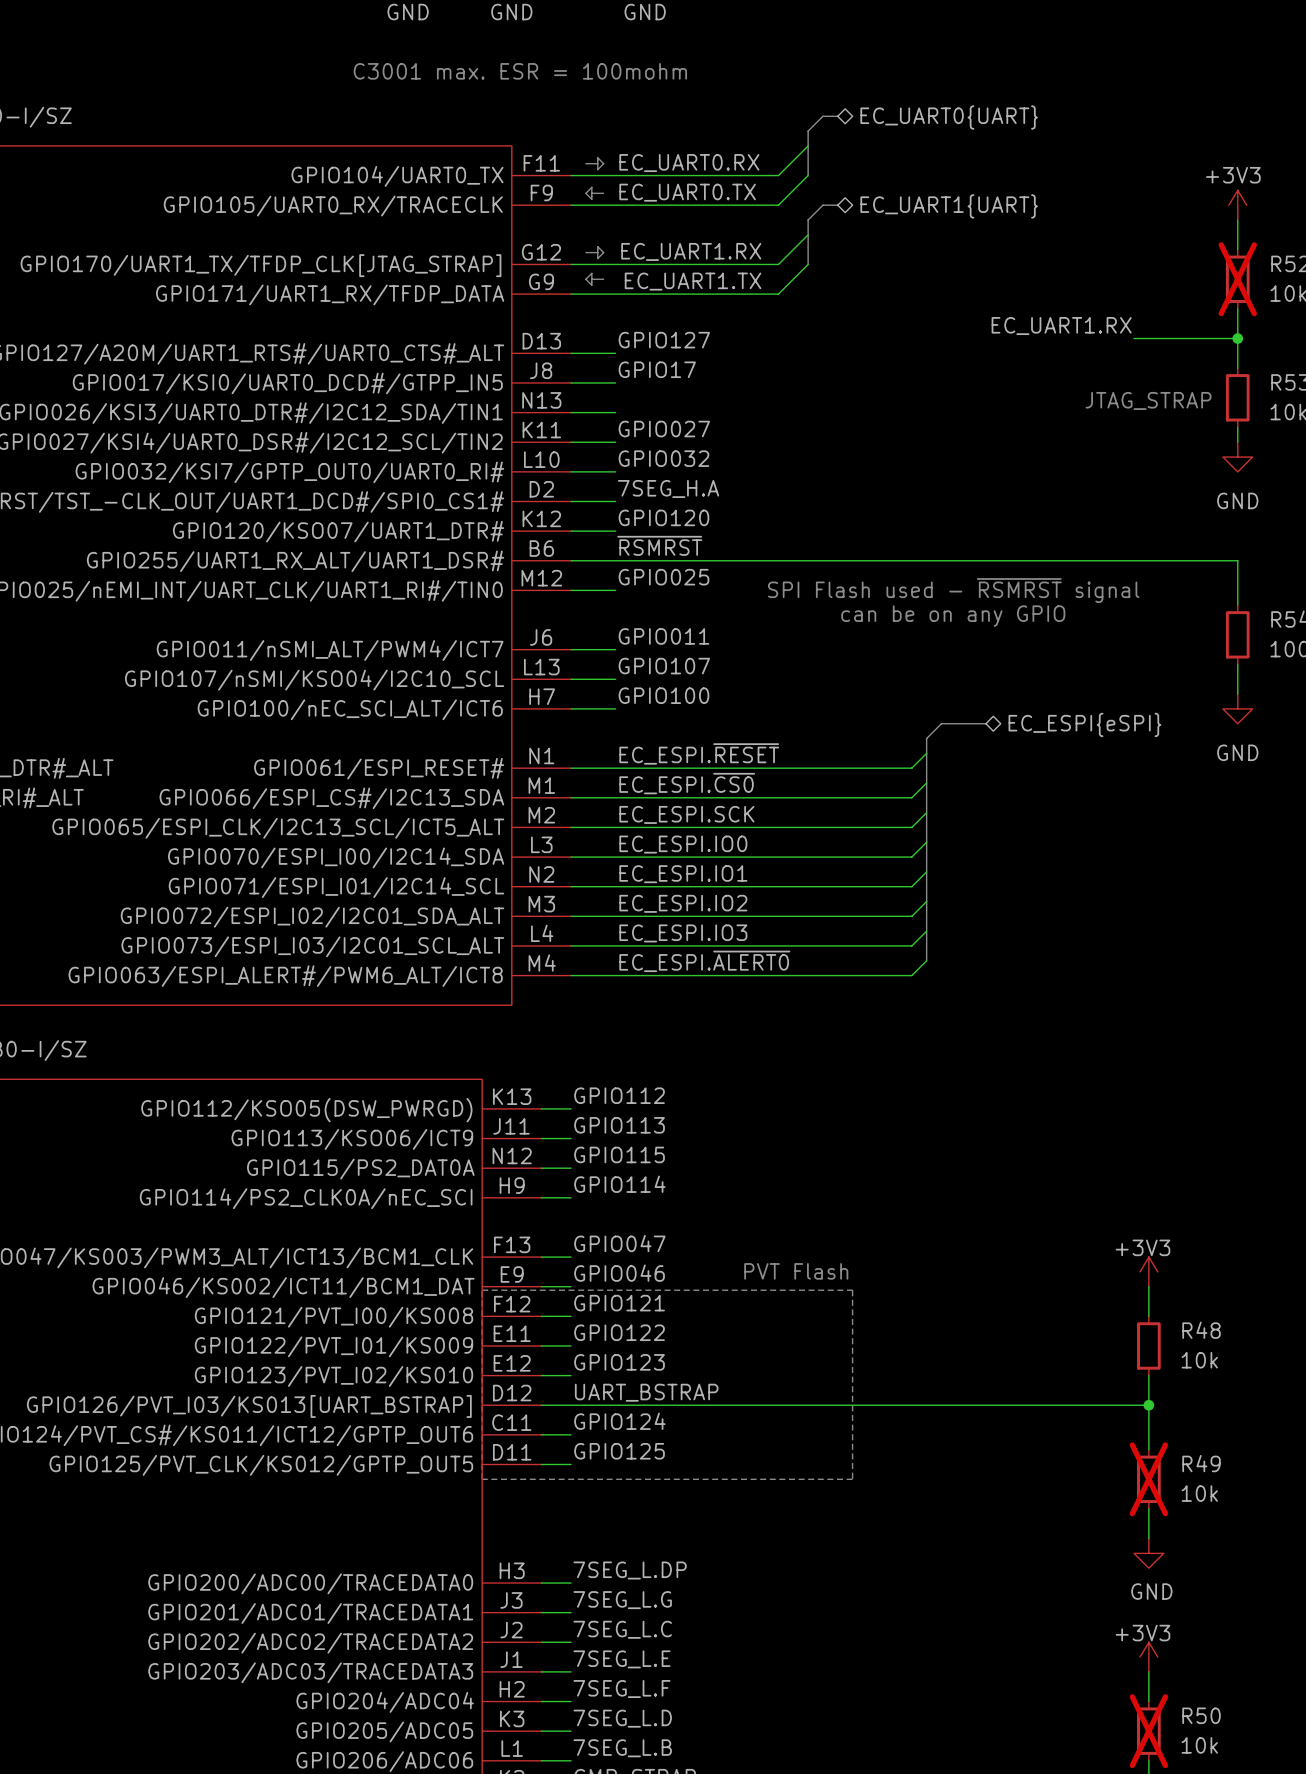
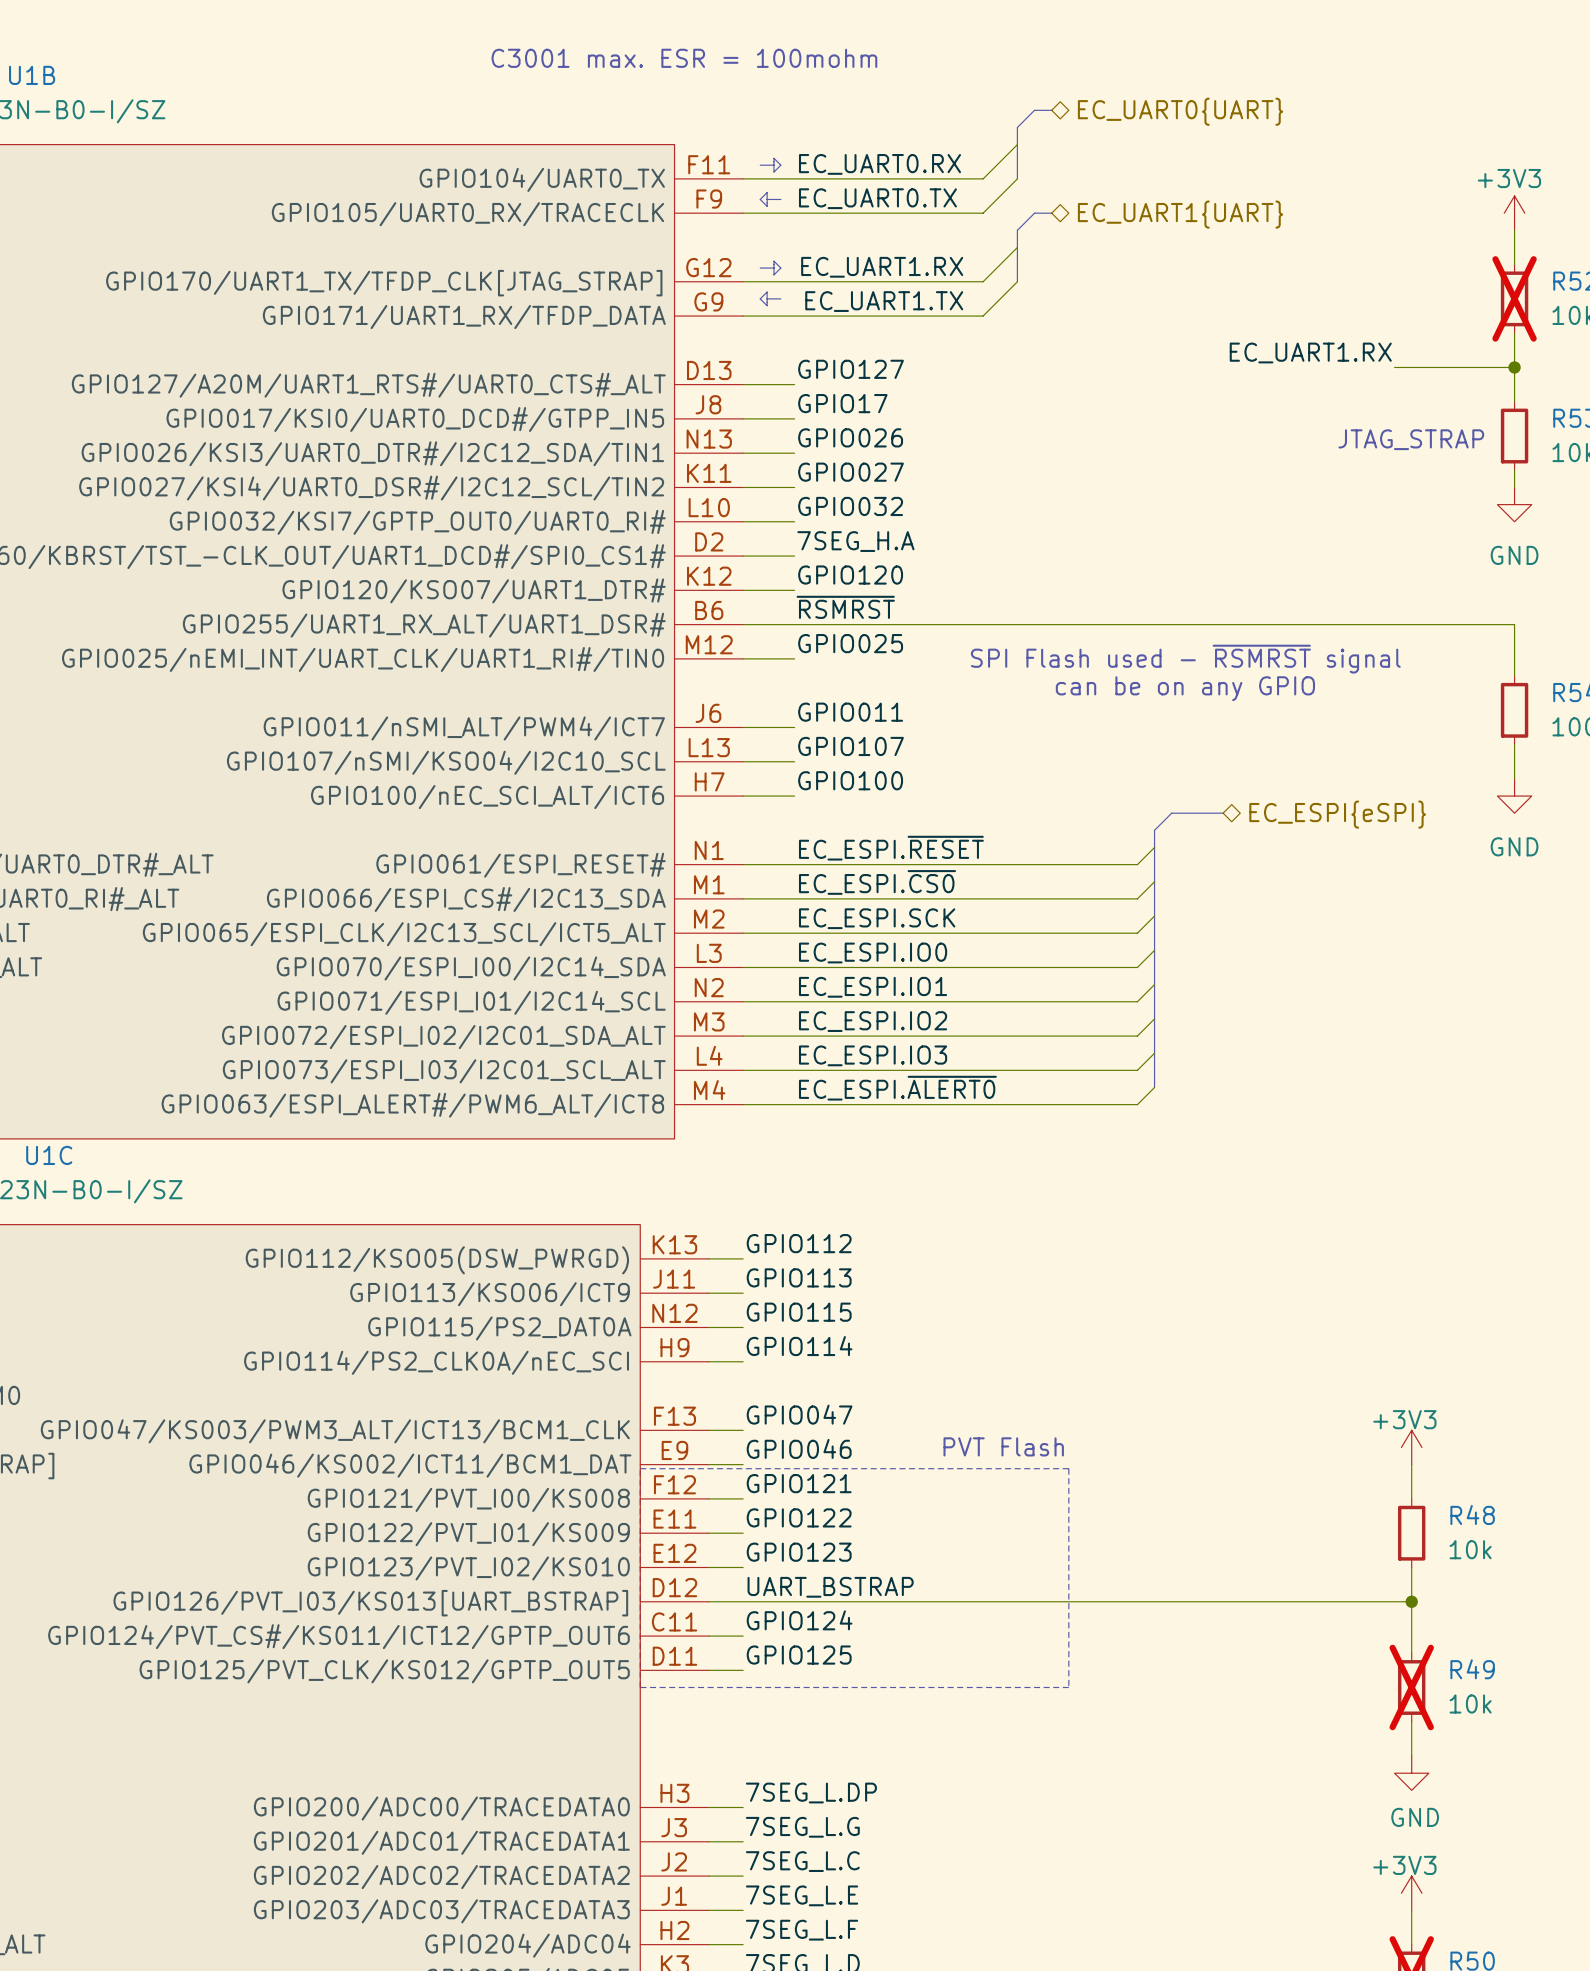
label: none -> GPIO026 (850, 437)

